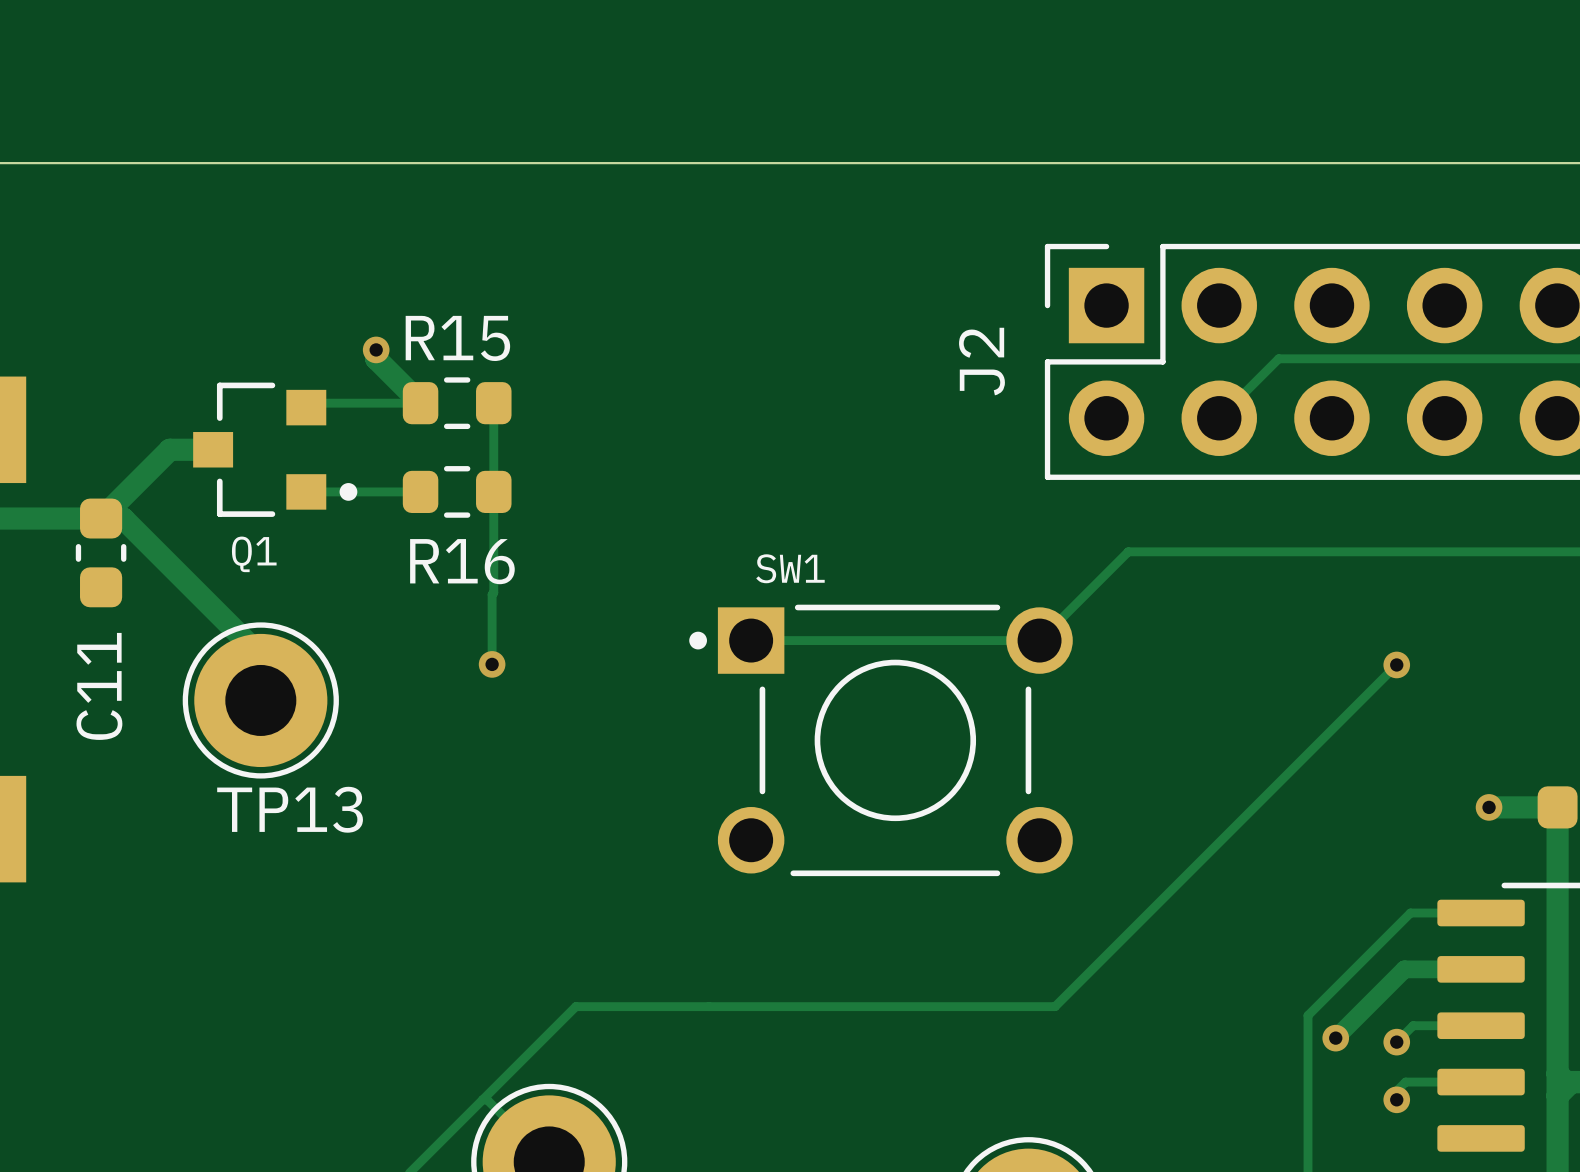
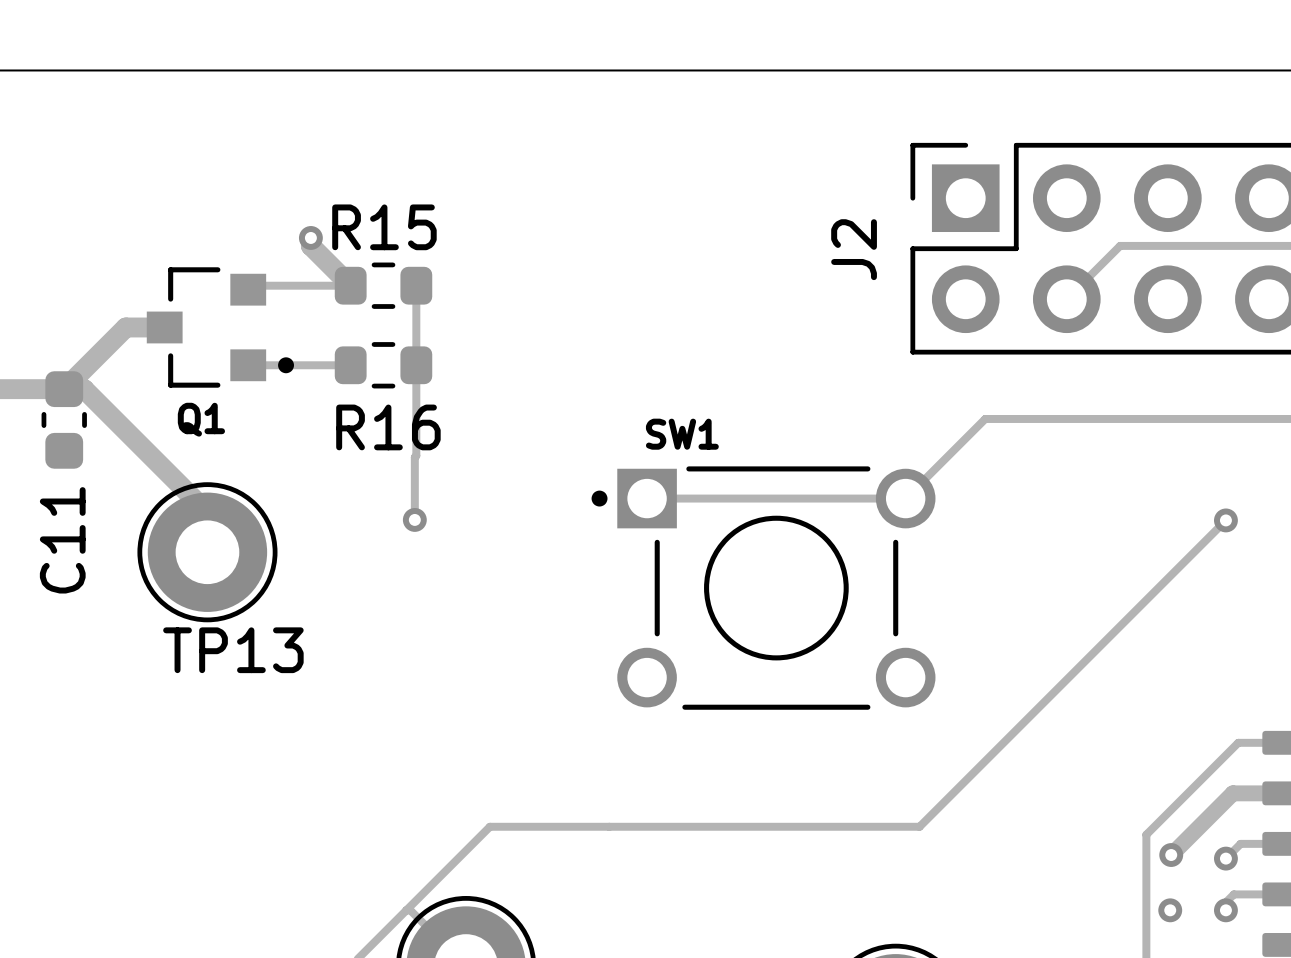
via: none -> (1170, 910)

